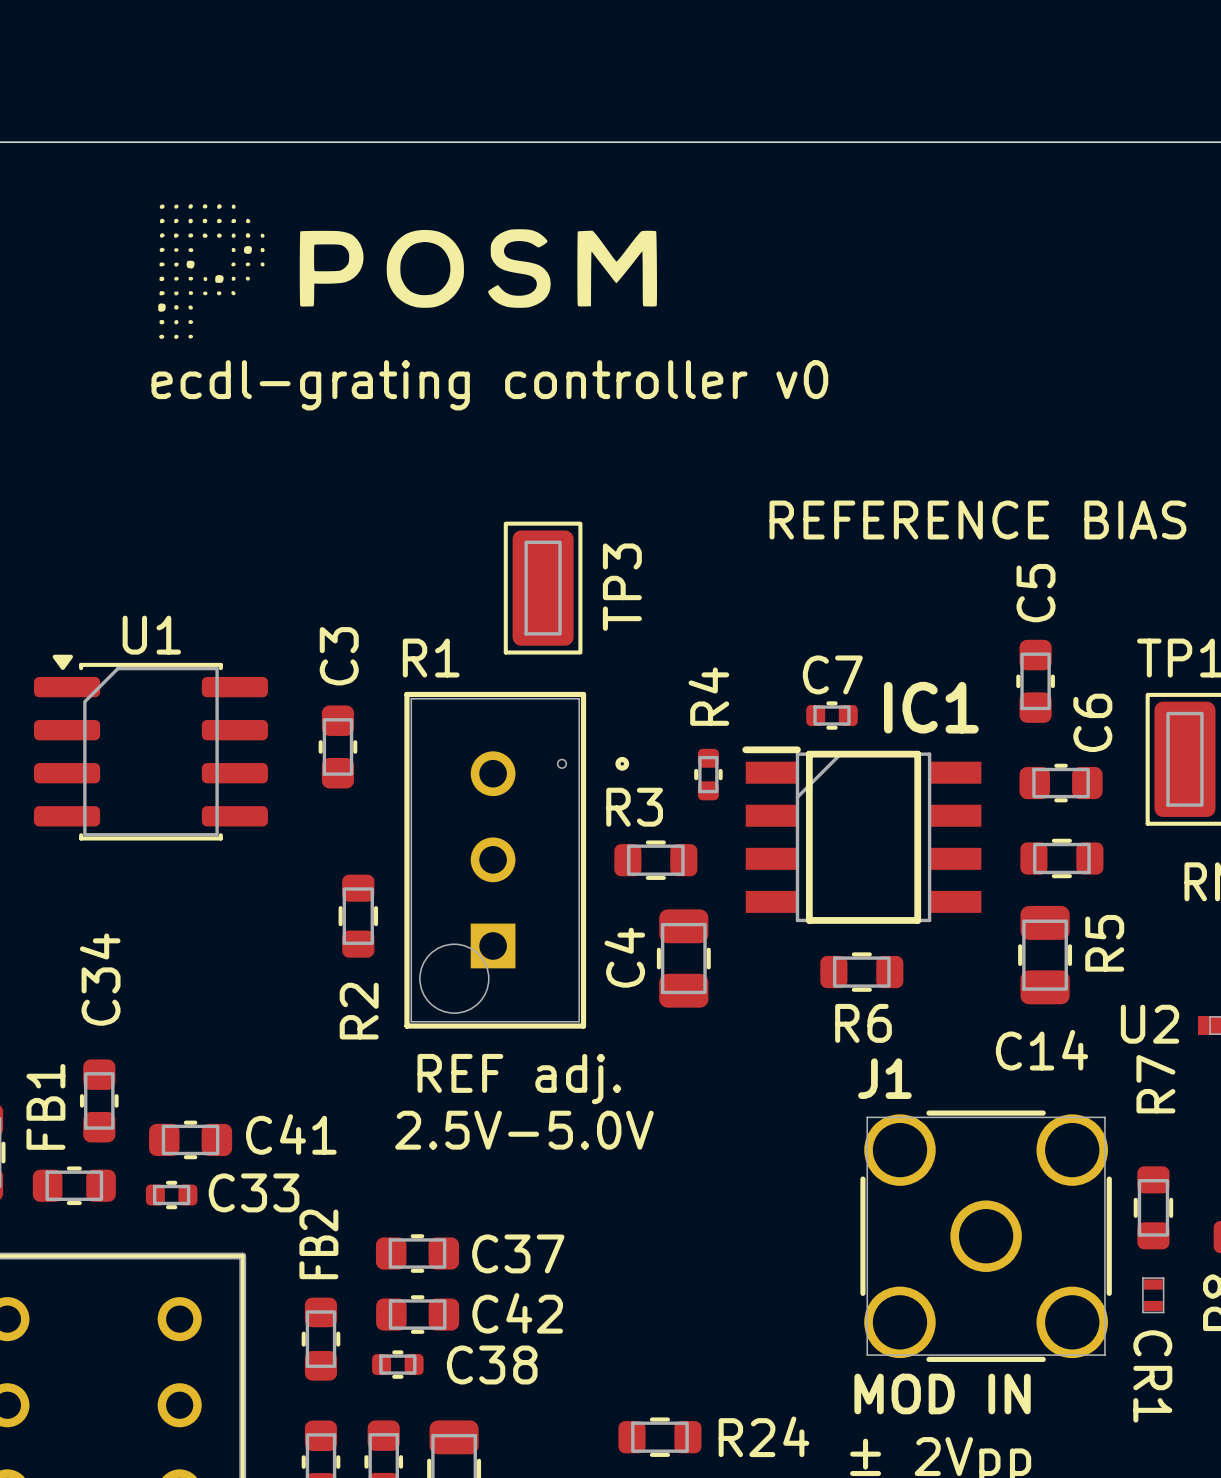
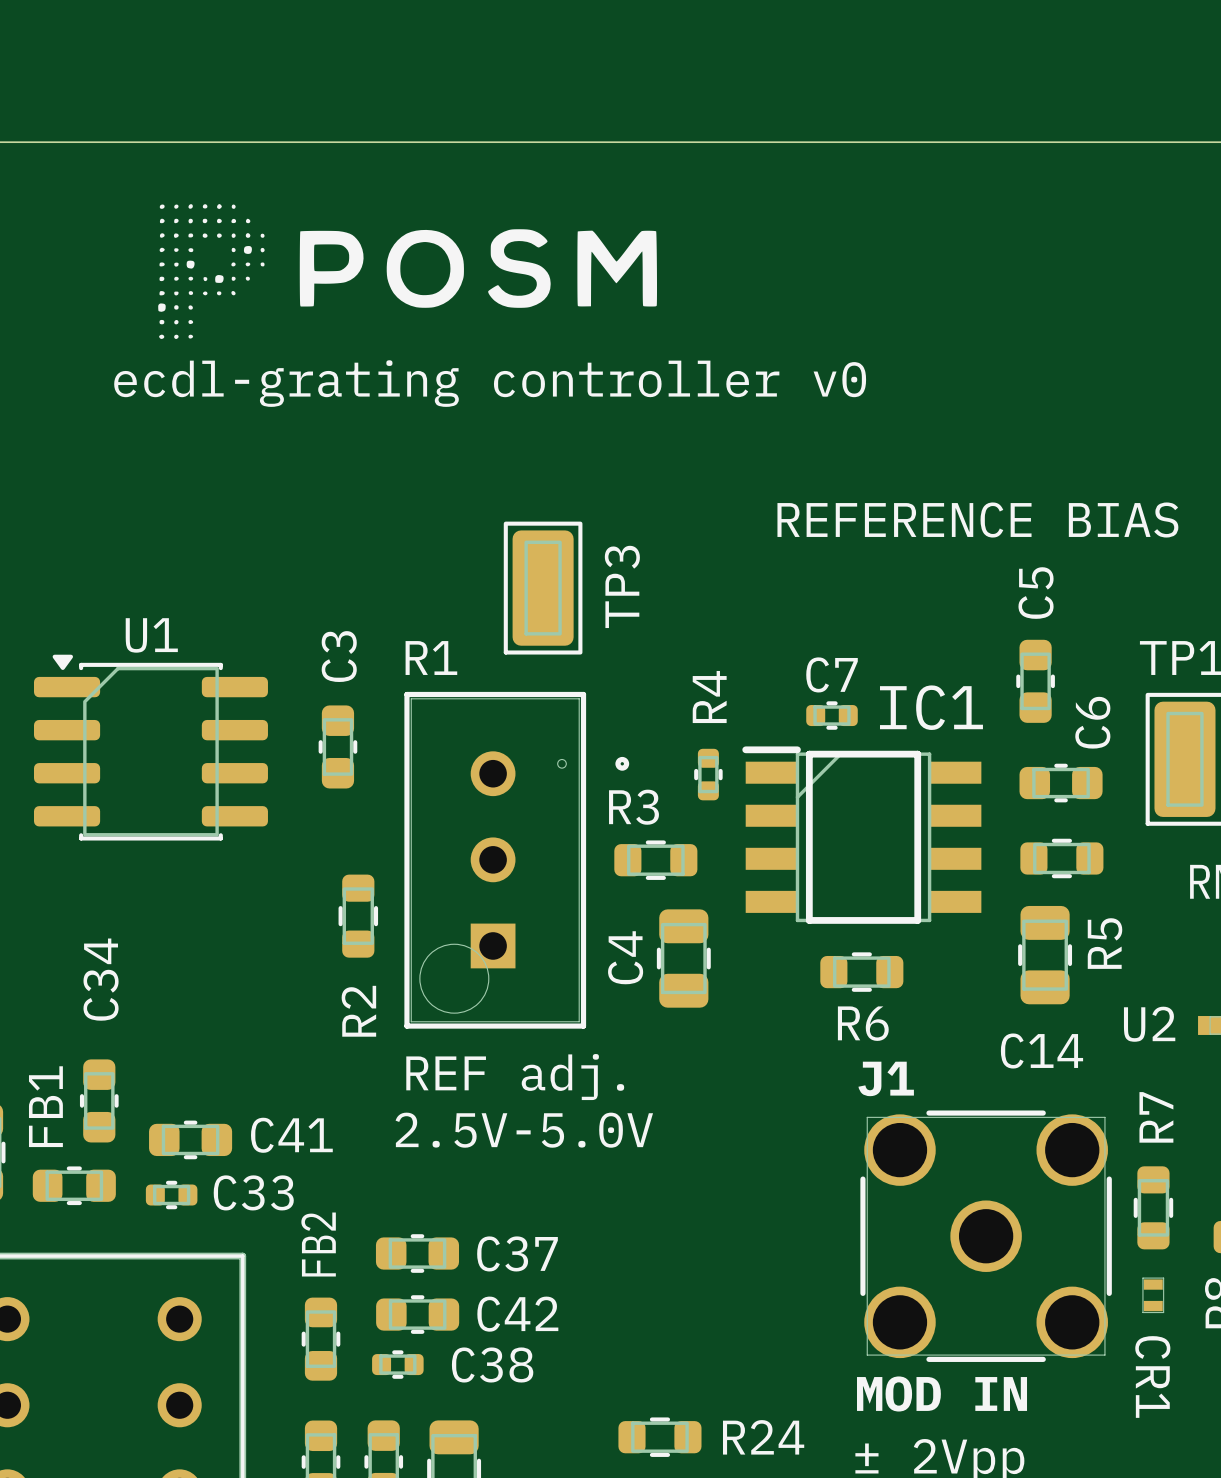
R7 name position: R7 (1155, 1084) -> R7 (1156, 1117)

